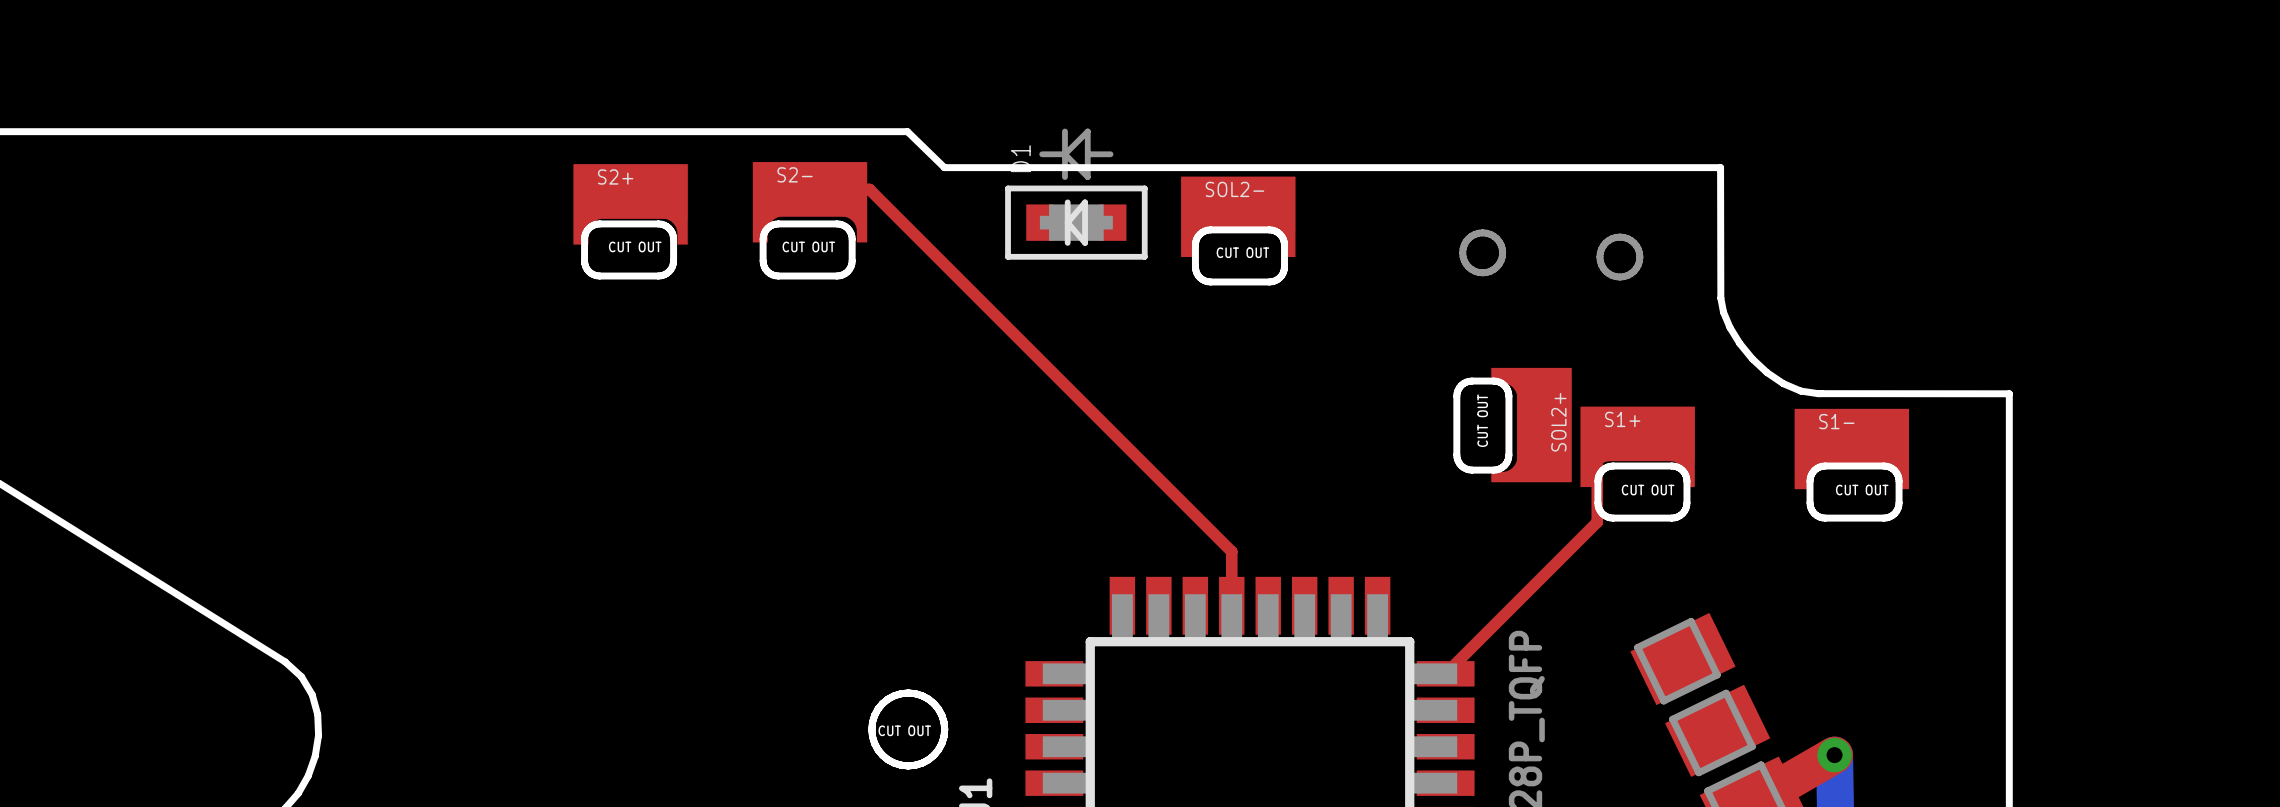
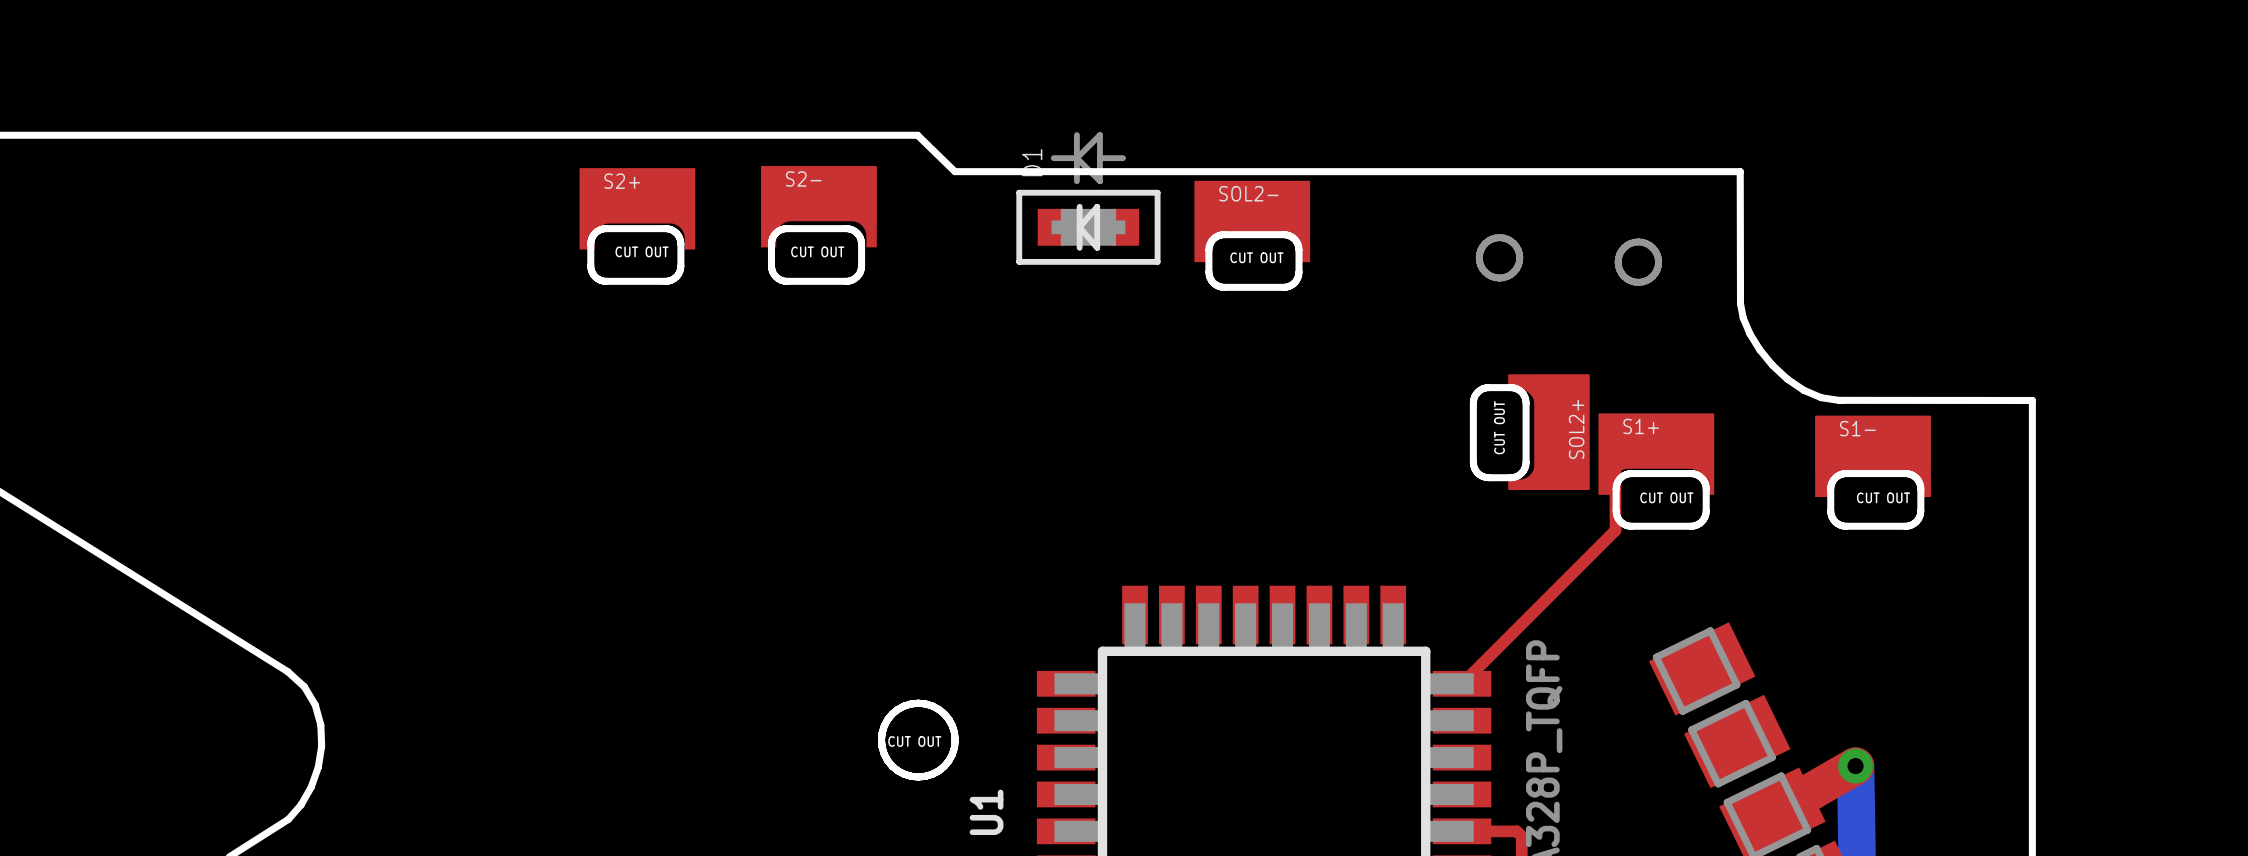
top track: (810, 189) (869, 189) (1231, 551) (1231, 605) -> none

